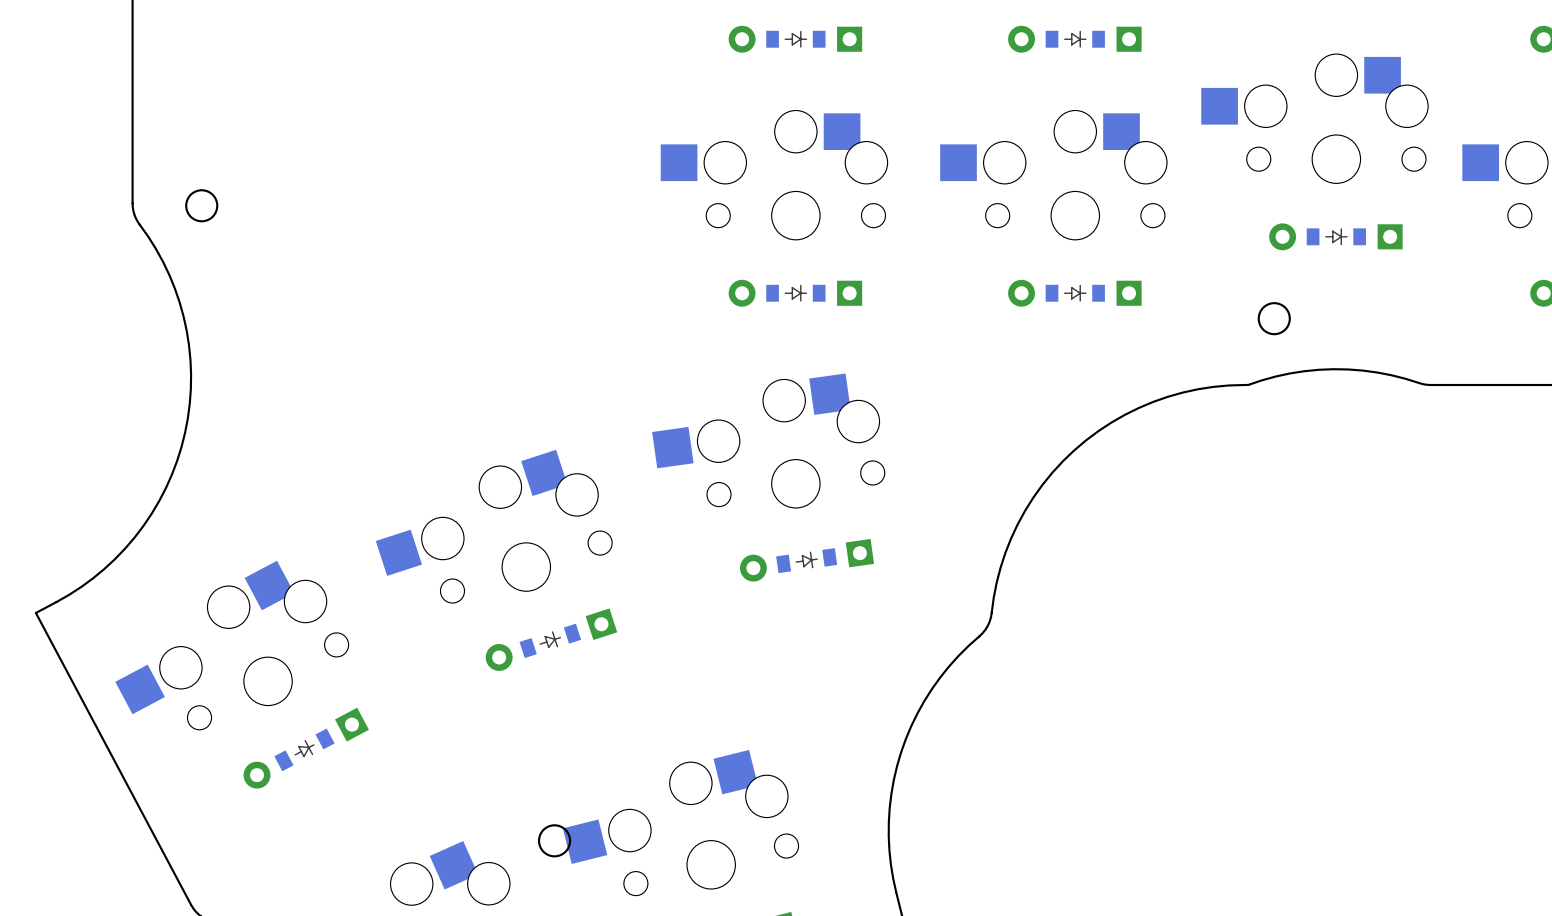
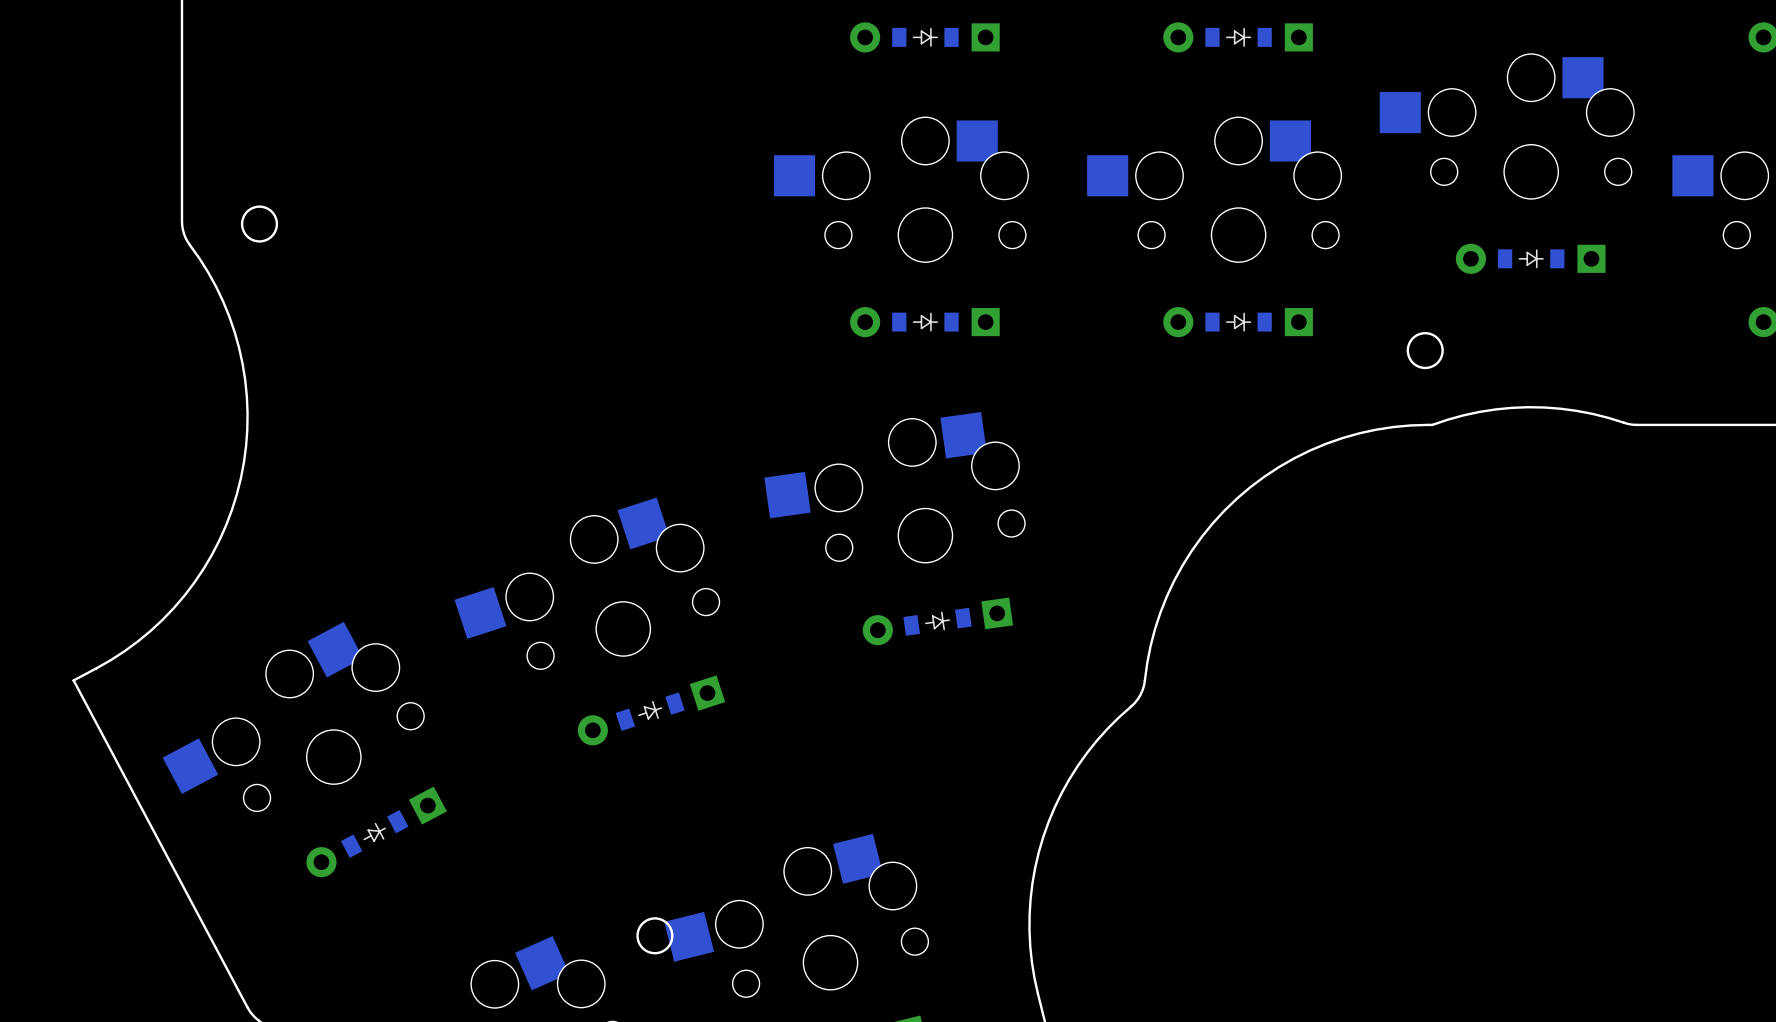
round board edge position: (1274, 318) -> (1425, 350)

